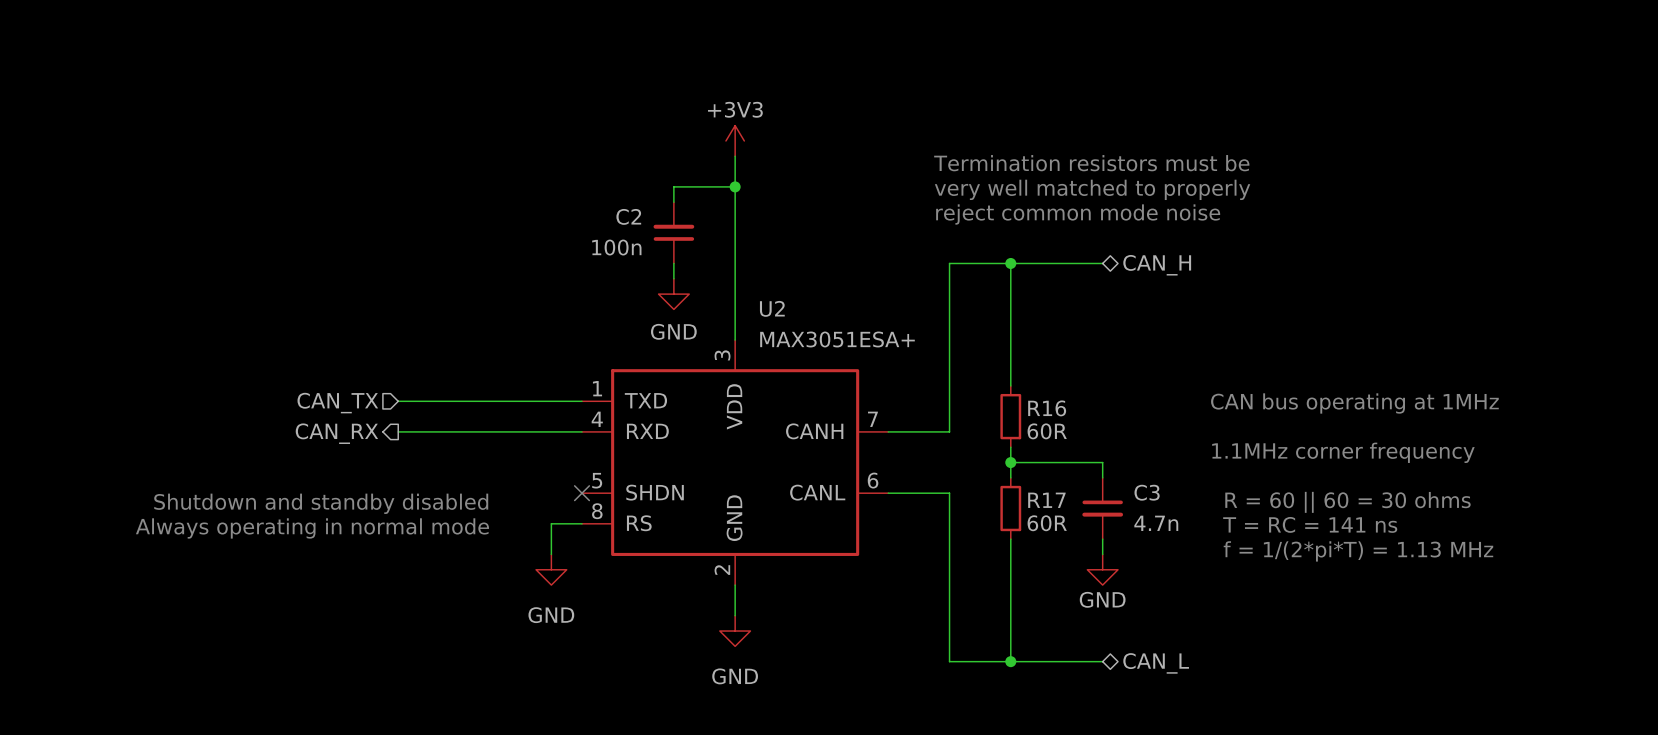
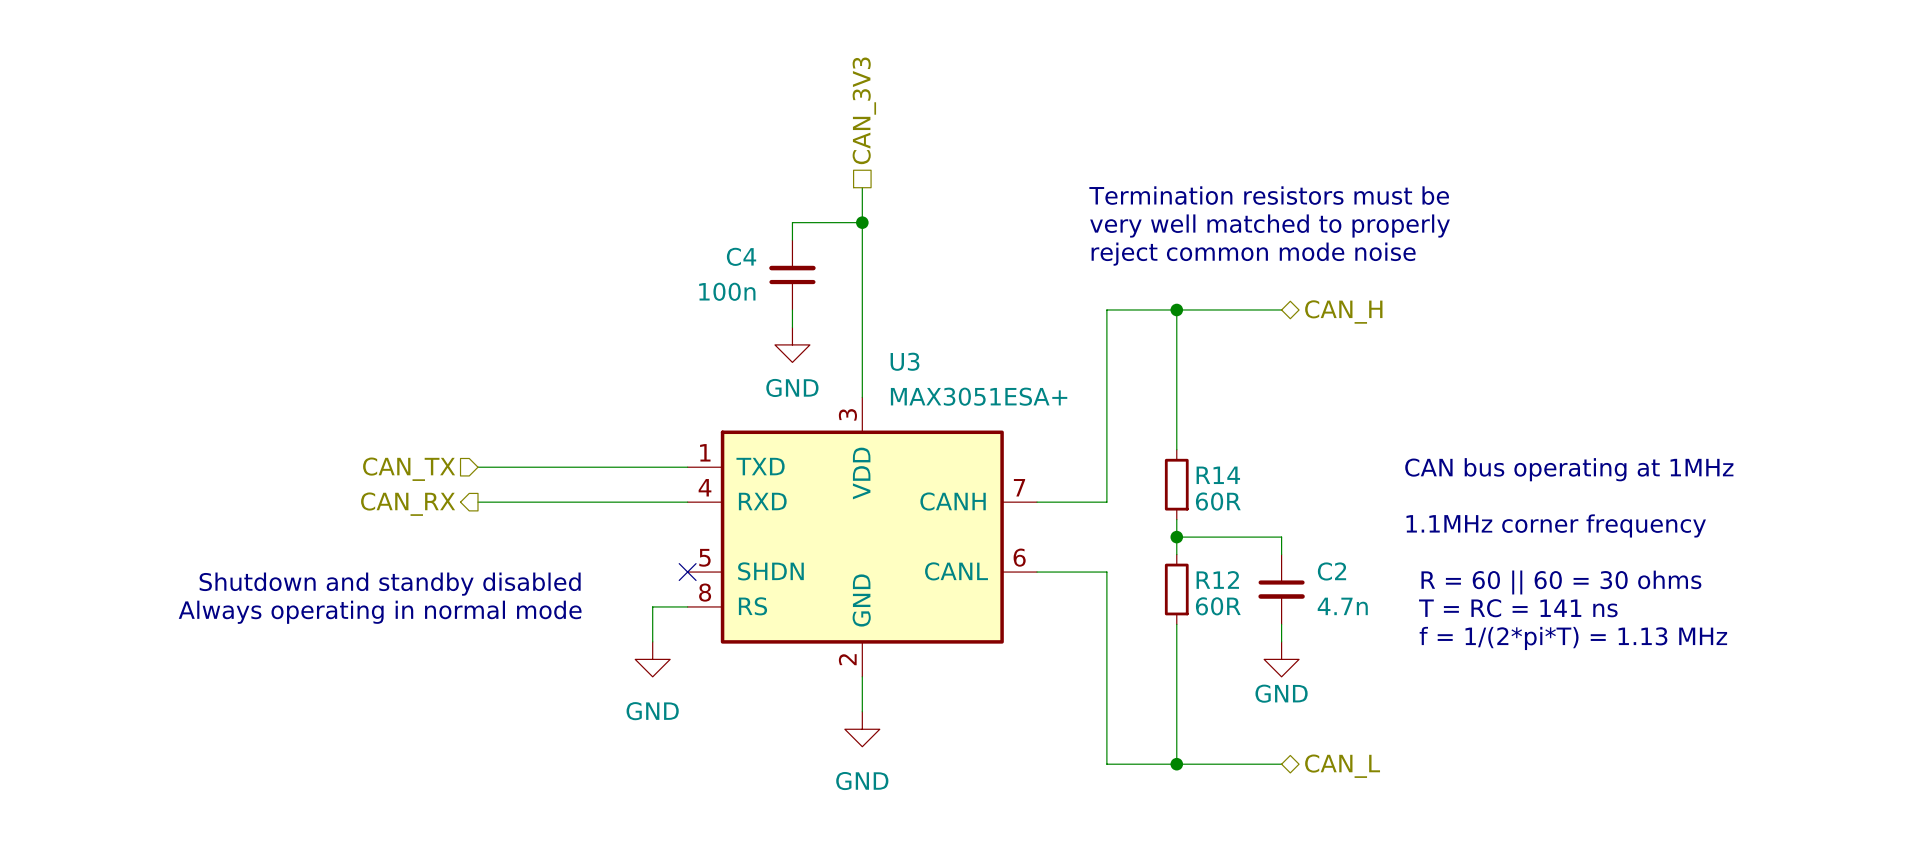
hierarchical label: none -> CAN_3V3 (864, 110)
power symbol: +3V3 (735, 140) -> none
C2 name: C2 (628, 216) -> C4 (741, 256)
U2 name: U2 (772, 308) -> U3 (905, 361)
R16 name: R16 (1047, 408) -> R14 (1218, 475)
C3 name: C3 (1147, 492) -> C2 (1331, 571)
R17 name: R17 (1046, 500) -> R12 (1217, 579)

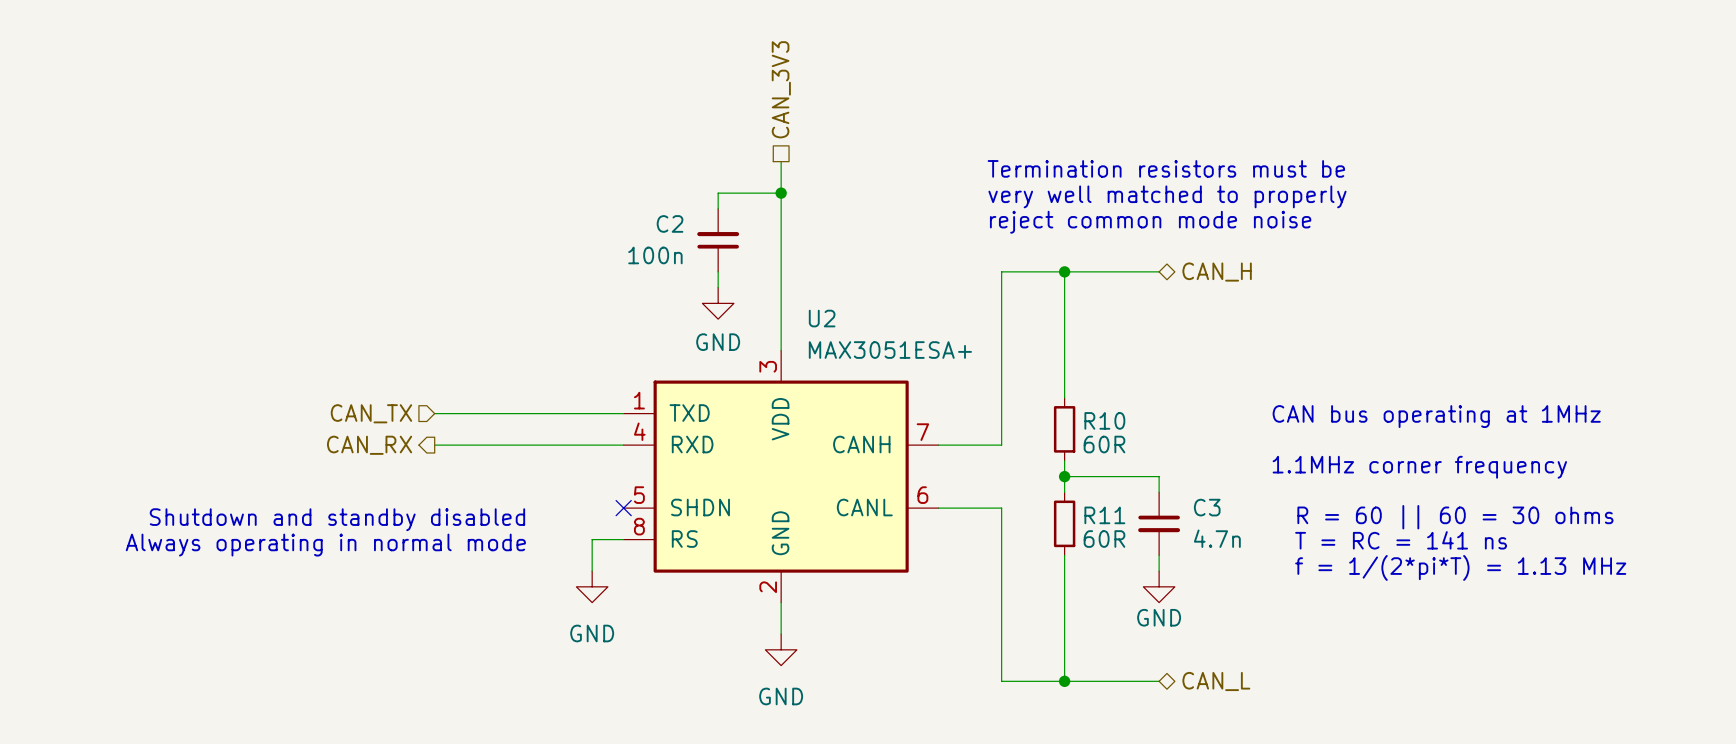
C4 name: C4 (741, 256) -> C2 (670, 223)
U3 name: U3 (905, 361) -> U2 (822, 318)
R14 name: R14 (1218, 475) -> R10 (1104, 420)
C2 name: C2 (1331, 571) -> C3 (1207, 507)
R12 name: R12 (1217, 579) -> R11 (1104, 515)

